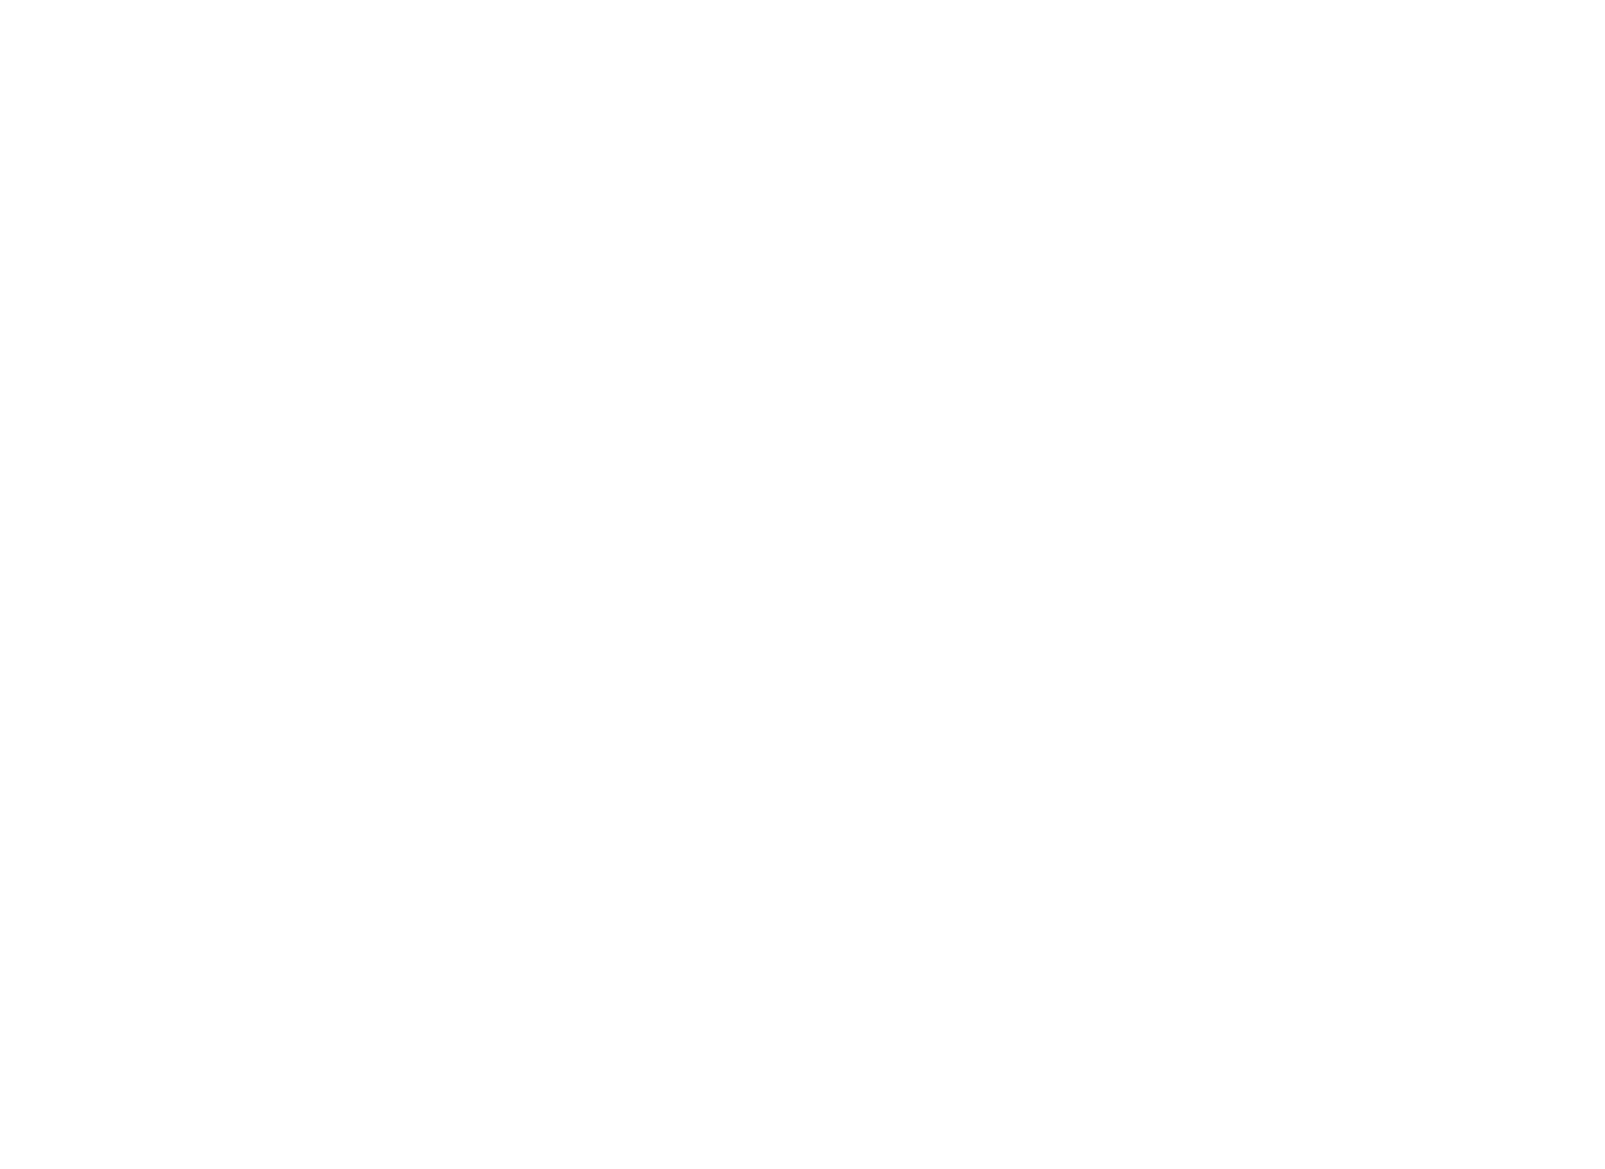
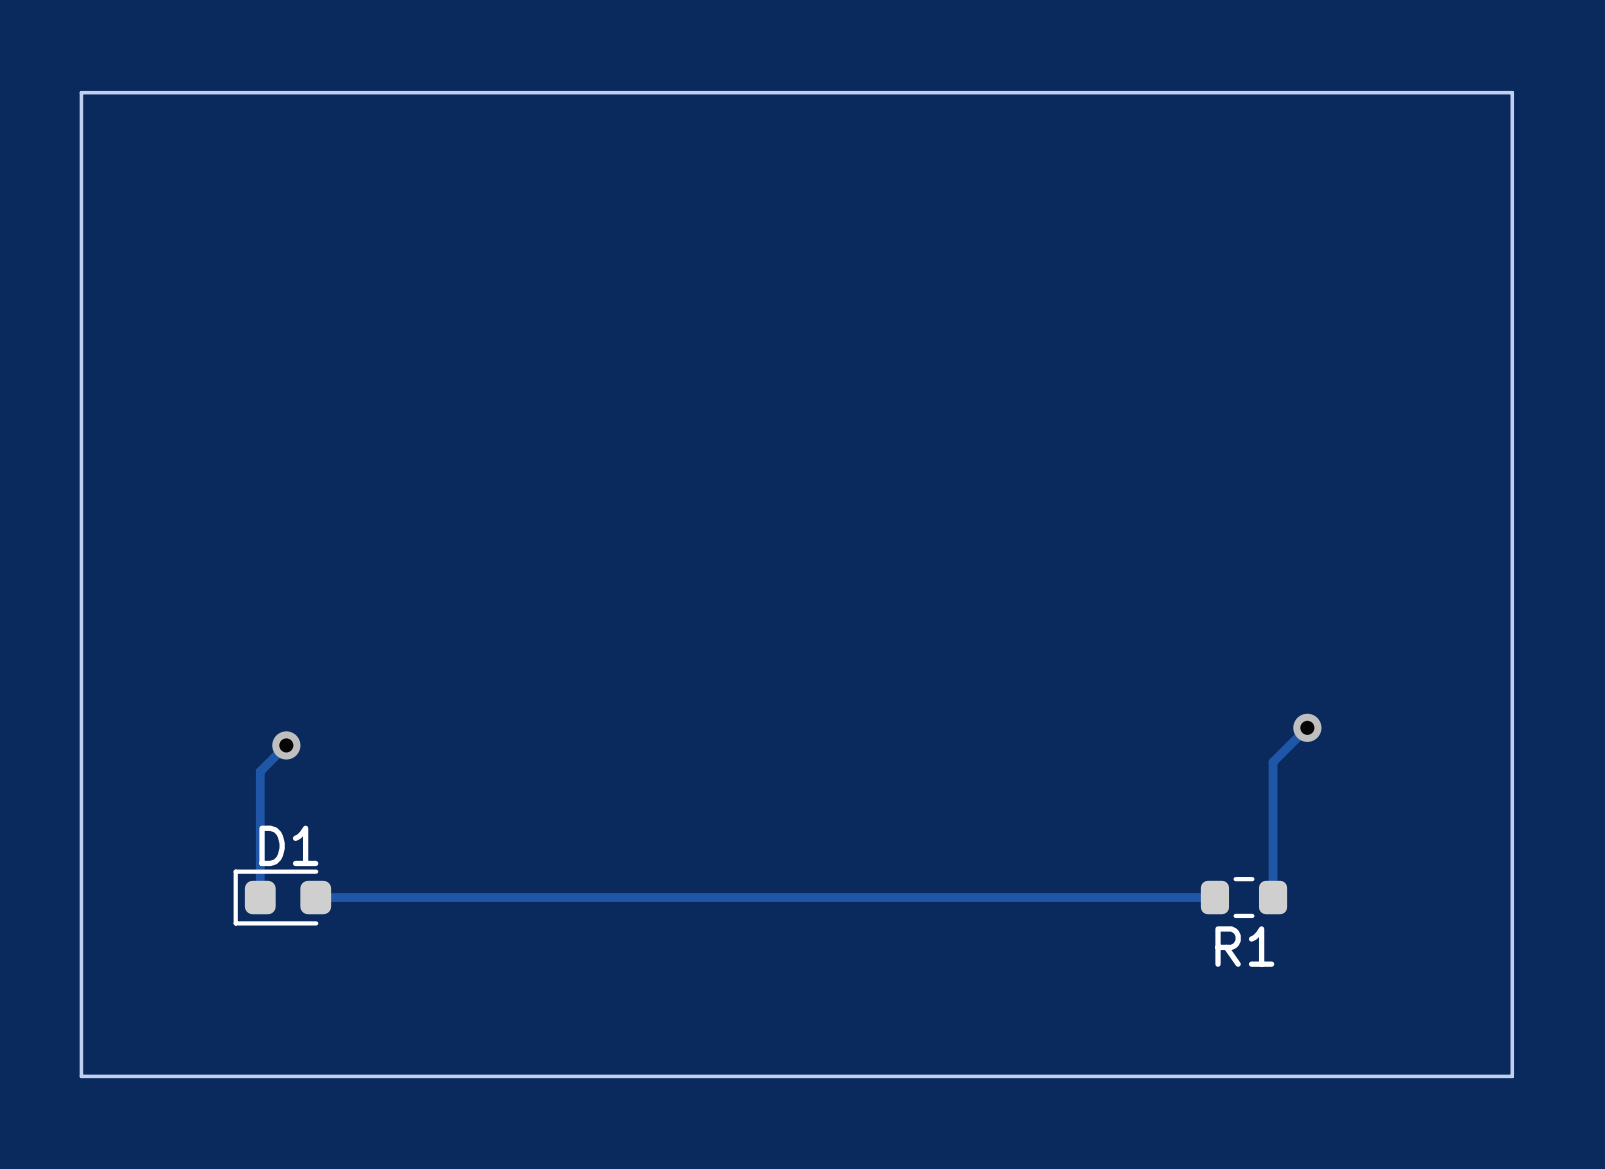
board edge: none -> (81, 92) (1512, 92) (1512, 1076) (81, 1076) (81, 92)
track: none -> (1307, 727) (1273, 762) (1273, 897)
via: none -> (1307, 727)
track: none -> (286, 745) (260, 771) (260, 897)
via: none -> (286, 745)
D1: none -> (282, 897)
track: none -> (315, 897) (1214, 897)
R1: none -> (1244, 897)

